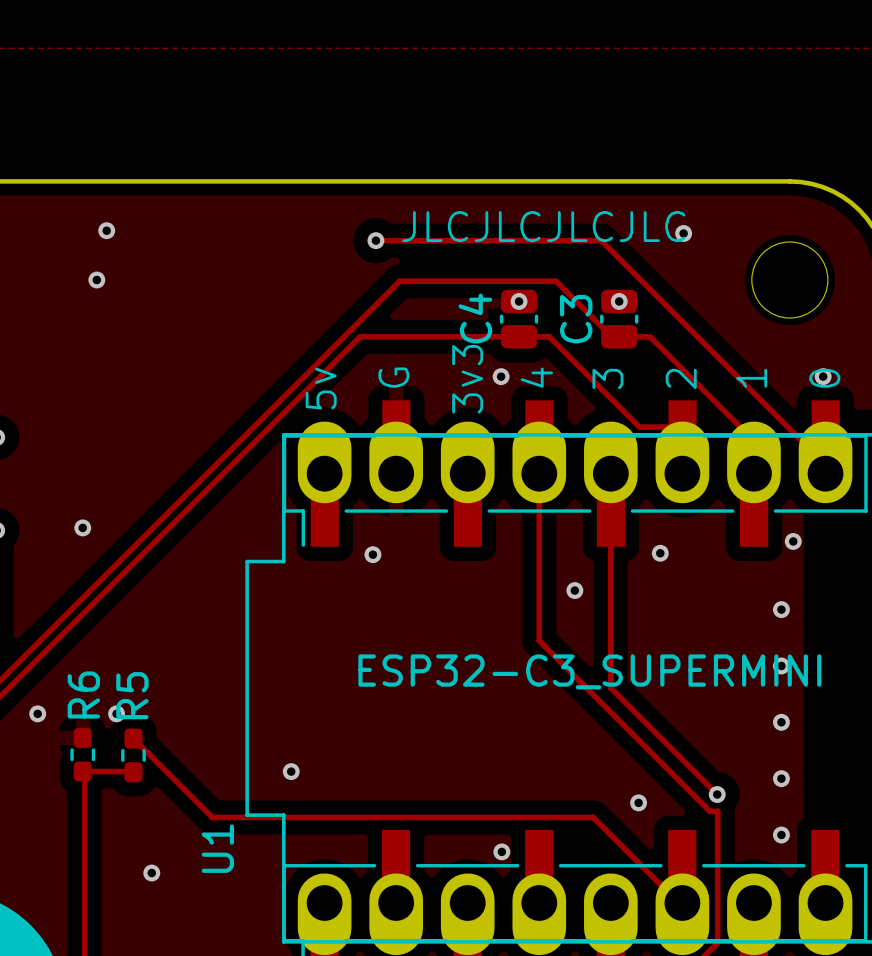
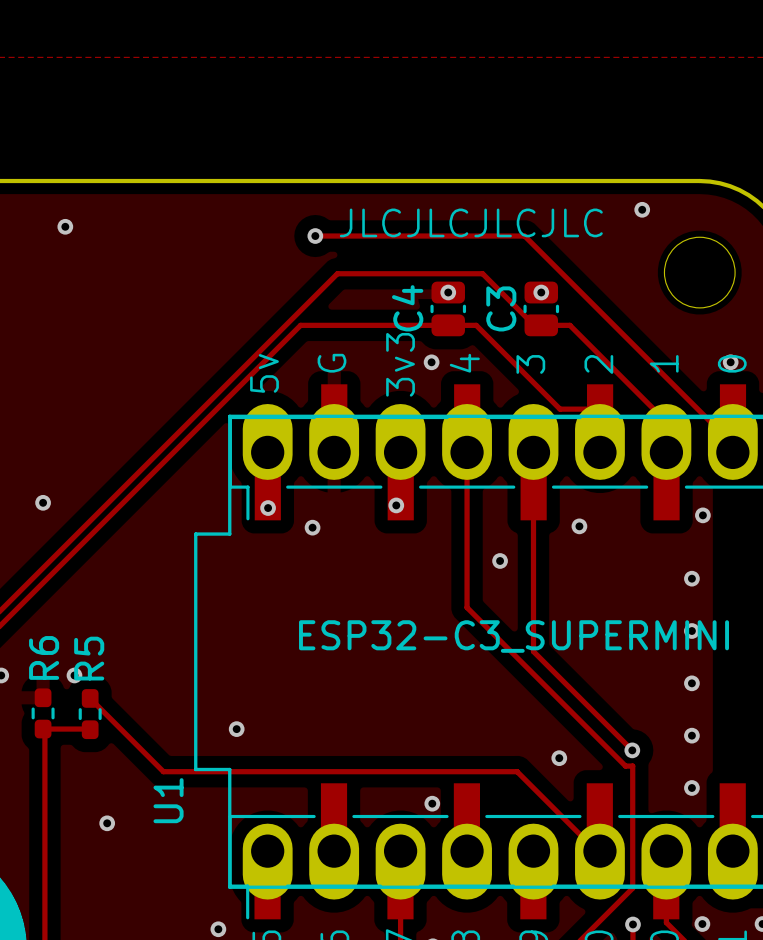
via position: (683, 233) -> (642, 209)
via: (96, 280) -> none
via: none -> (396, 505)
via: none -> (268, 508)

